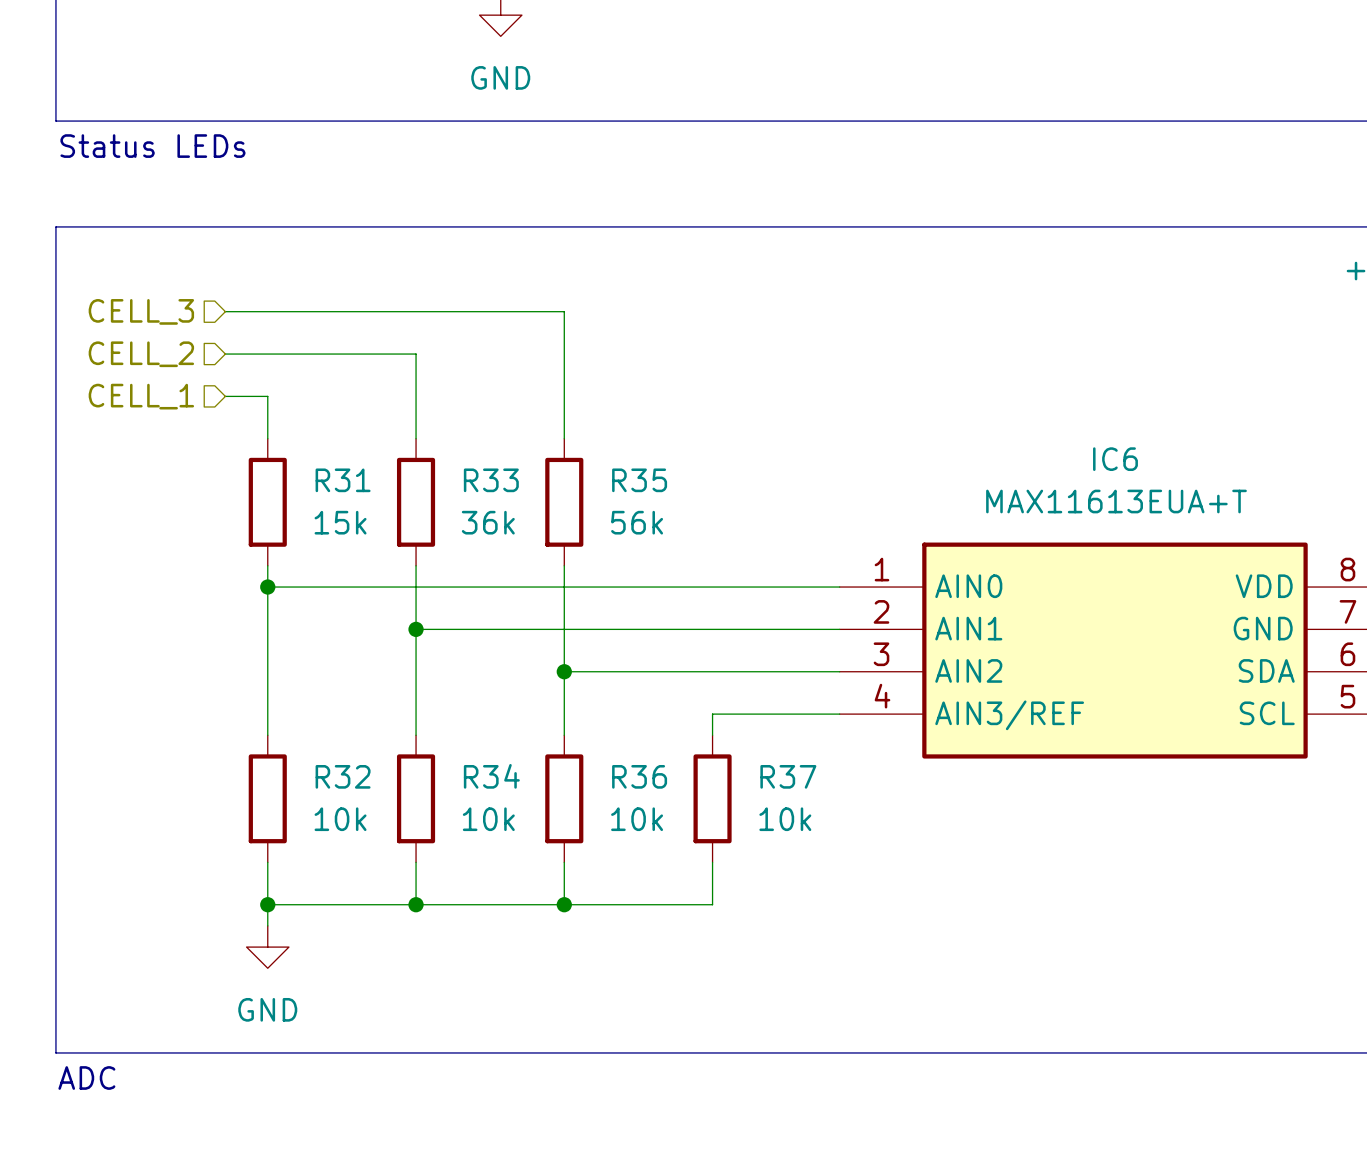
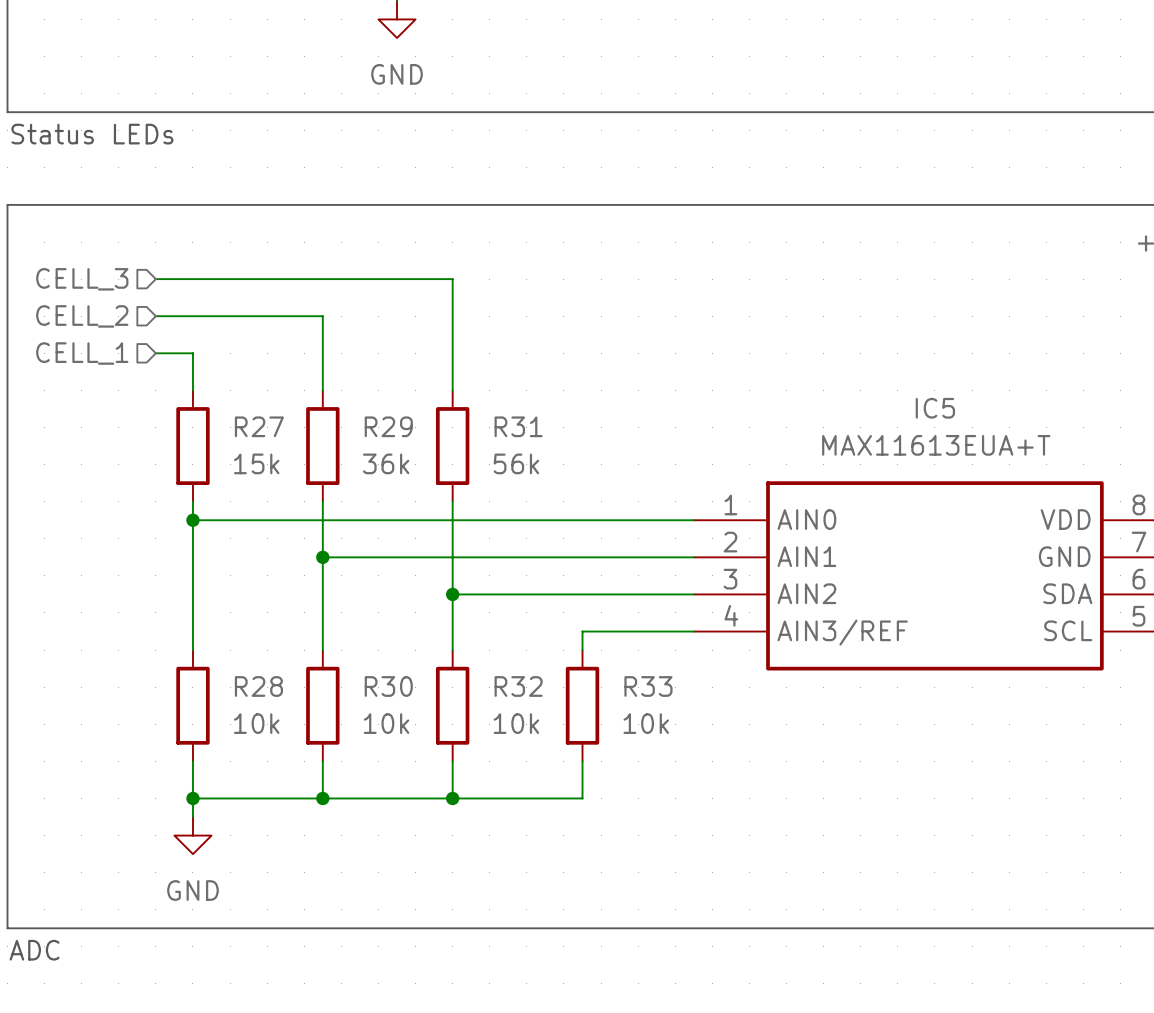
IC6 name: IC6 (1115, 459) -> IC5 (935, 408)
R31 name: R31 (343, 480) -> R27 (259, 426)
R33 name: R33 (491, 480) -> R29 (388, 426)
R35 name: R35 (639, 480) -> R31 (518, 426)
R32 name: R32 (343, 776) -> R28 (258, 686)
R34 name: R34 (491, 776) -> R30 (388, 686)
R36 name: R36 (639, 776) -> R32 (518, 686)
R37 name: R37 (788, 776) -> R33 (648, 686)

